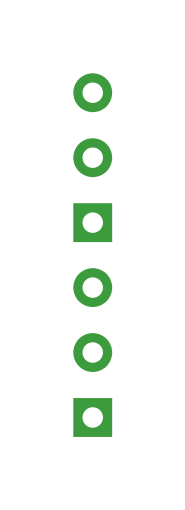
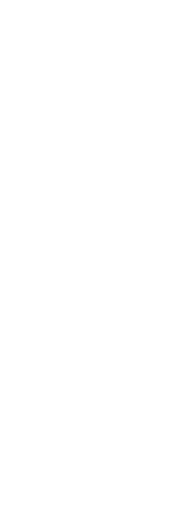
part: (92, 157) -> none
part: (92, 352) -> none

